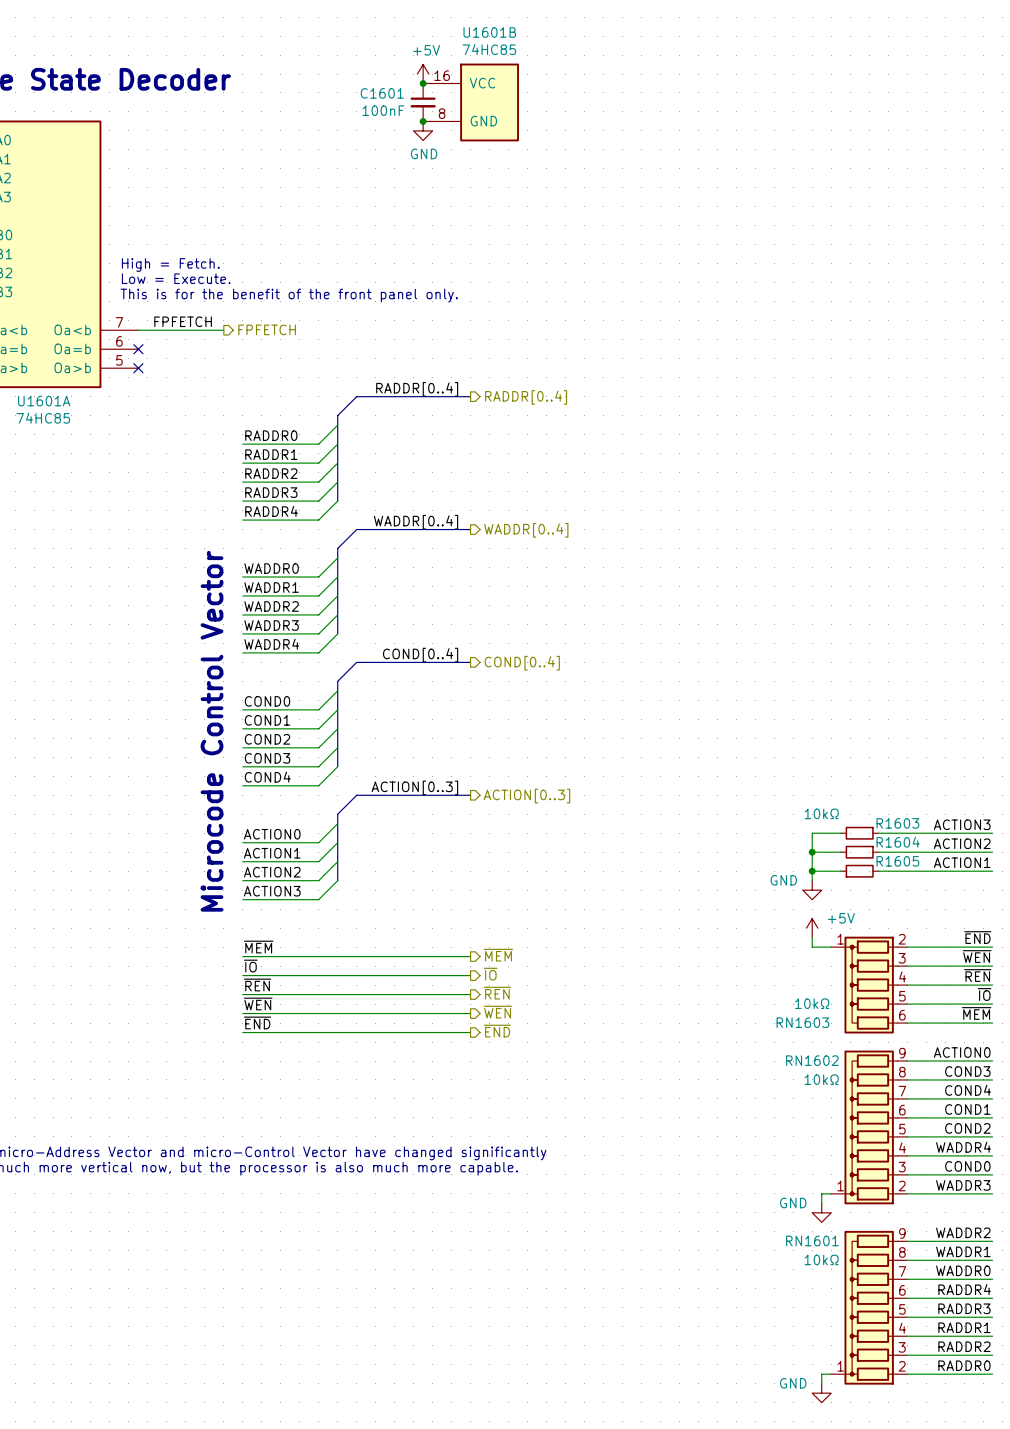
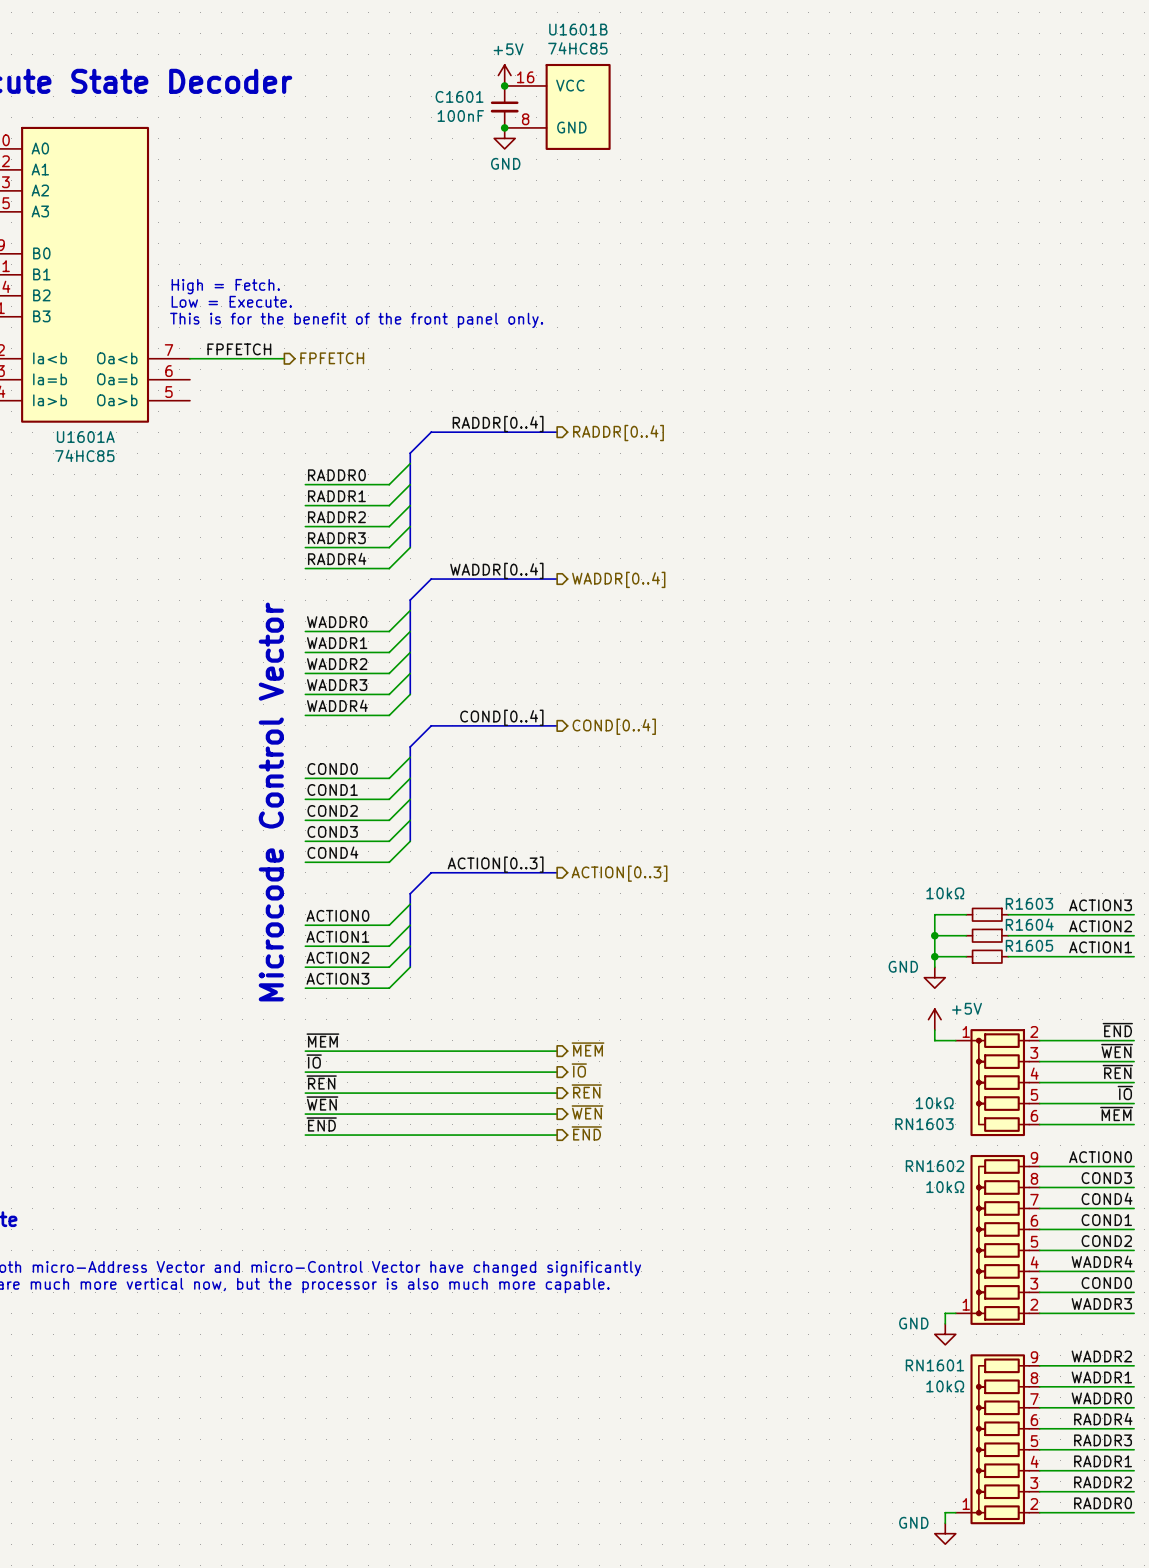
no-connect mark: (138, 349) -> none
no-connect mark: (138, 368) -> none

